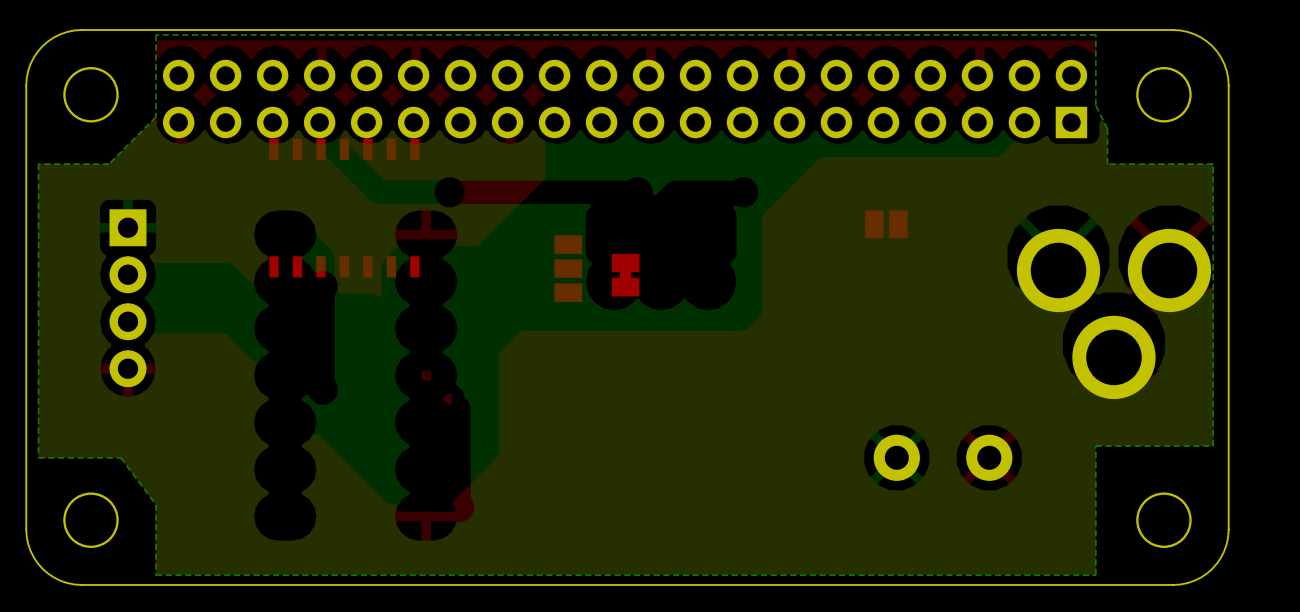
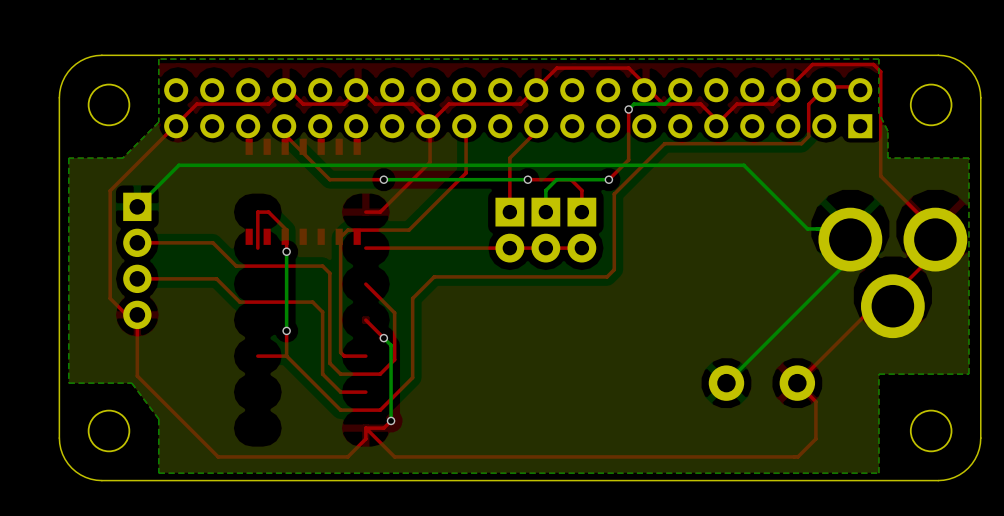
top track: none -> (285, 86) (268, 104) (196, 104) (110, 190) (110, 298) (126, 314) (137, 314) (137, 376) (218, 456) (347, 456) (365, 438) (365, 428)
top track: none -> (286, 86) (303, 104) (344, 104) (358, 90) (358, 86) (375, 104) (412, 104) (430, 121) (430, 162) (380, 212) (365, 212)
top track: none -> (537, 86) (520, 104) (448, 104) (430, 122)
bottom track: none -> (682, 86) (664, 104) (634, 104) (628, 109)
top track: none -> (790, 86) (812, 64) (873, 64) (880, 71) (880, 176) (935, 228) (935, 253) (892, 295) (884, 295) (797, 383) (815, 401) (815, 438) (797, 456) (394, 456) (365, 428)
top track: none -> (789, 86) (772, 104) (736, 104) (718, 122) (700, 104) (663, 104) (628, 68) (556, 68) (538, 86)
top track: none -> (862, 86) (826, 86) (808, 104) (808, 136) (801, 143) (664, 143) (614, 194) (614, 269) (607, 276) (434, 276) (412, 298) (412, 377) (380, 410) (340, 410) (286, 356)
top track: none -> (628, 109) (628, 159) (608, 179)
via: none -> (628, 109)
top track: none -> (286, 122) (286, 135) (329, 179) (383, 179)
top track: none -> (466, 122) (466, 173) (409, 230) (347, 230) (340, 237) (340, 352) (344, 356) (365, 356)
top track: none -> (538, 122) (538, 129) (509, 158) (509, 212)
via: none -> (383, 179)
bottom track: none -> (527, 179) (383, 179)
top track: none -> (527, 179) (571, 179) (581, 190) (581, 212)
via: none -> (527, 179)
bottom track: none -> (608, 179) (556, 179) (545, 190) (545, 212)
via: none -> (608, 179)
part: (886, 224) -> none
bottom track: none -> (137, 206) (178, 165) (743, 165) (807, 228) (850, 228) (850, 259) (726, 383)
part: none -> (509, 230)
part: none -> (545, 230)
part: none -> (581, 230)
part: (568, 268) -> none
top track: none -> (137, 242) (212, 242) (236, 266) (322, 266) (329, 273) (329, 363) (340, 374) (380, 374) (394, 359) (394, 312) (365, 284)
part: (625, 275) -> none
top track: none -> (257, 248) (257, 212) (268, 212) (286, 230) (286, 251)
top track: none -> (581, 248) (365, 248)
bottom track: none -> (286, 251) (286, 330)
via: none -> (286, 251)
top track: none -> (137, 278) (216, 278) (239, 302) (312, 302) (322, 312) (322, 374) (340, 392) (365, 392)
top track: none -> (365, 320) (383, 338)
top track: none -> (286, 330) (286, 356)
via: none -> (286, 330)
bottom track: none -> (383, 338) (391, 345) (391, 420)
via: none -> (383, 338)
top track: none -> (286, 356) (257, 356)
top track: none -> (391, 420) (383, 428) (365, 428)
via: none -> (391, 420)

